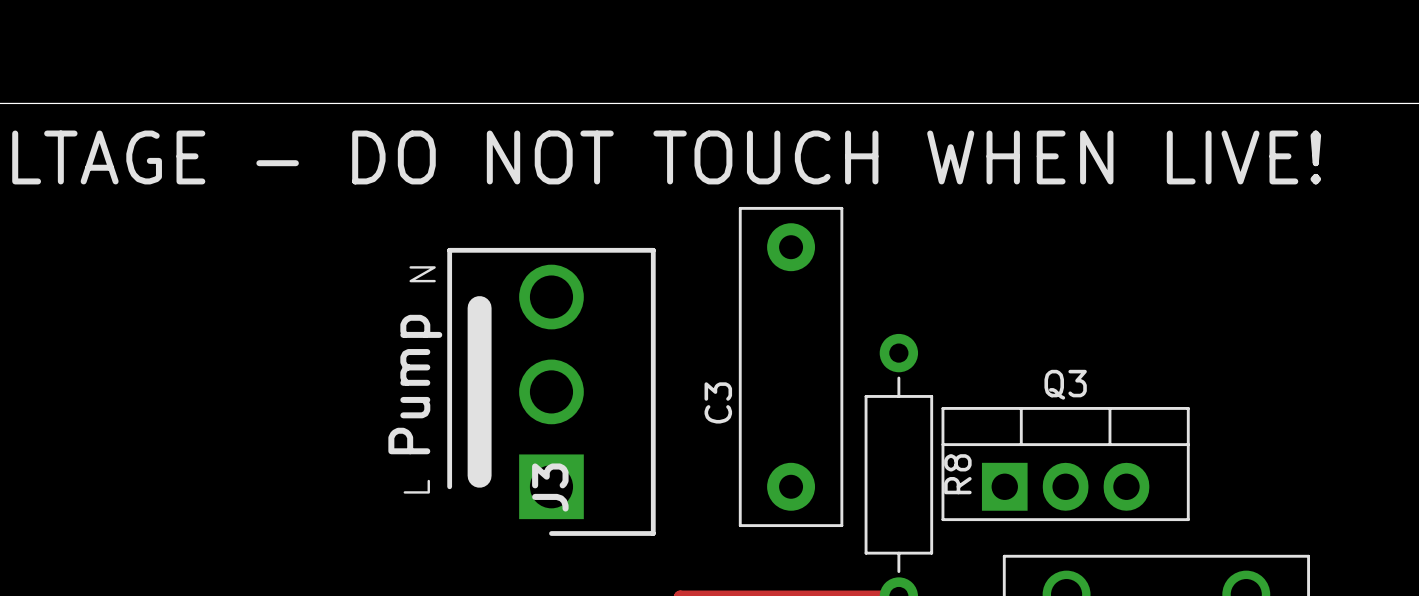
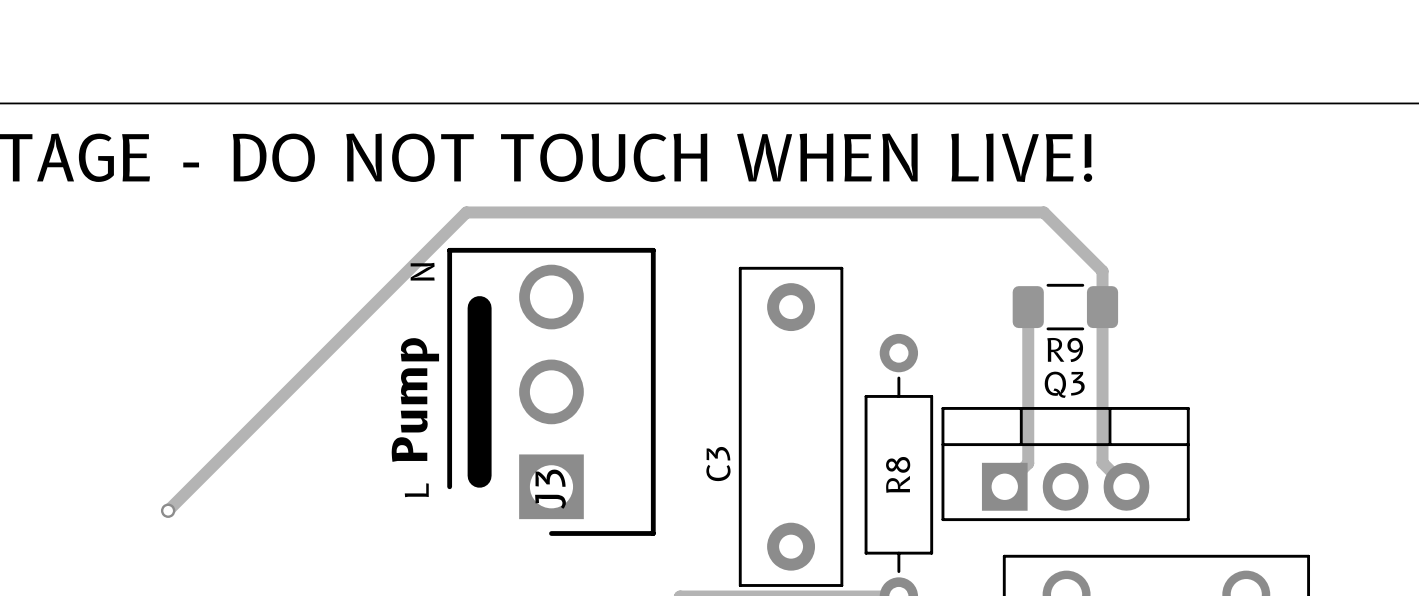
track: none -> (1028, 307) (1028, 463) (1004, 486)
R9: none -> (1065, 307)
C3 position: (791, 366) -> (791, 426)
R8 name position: R8 (957, 474) -> R8 (898, 474)
track: none -> (1126, 486) (1102, 462) (1102, 271) (1043, 212) (466, 212) (168, 510)
via: none -> (168, 510)

